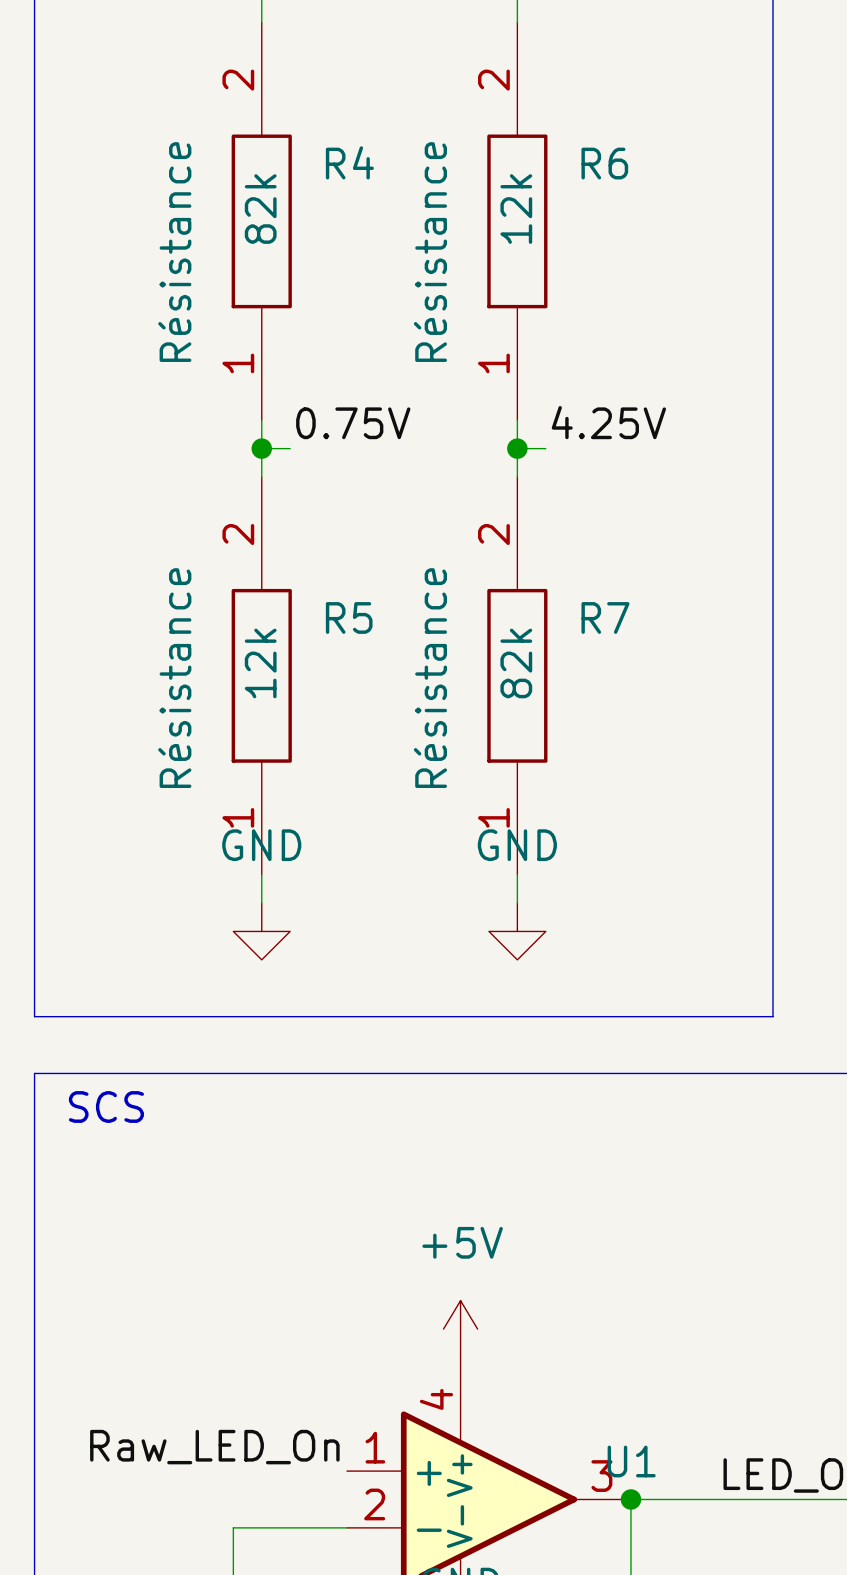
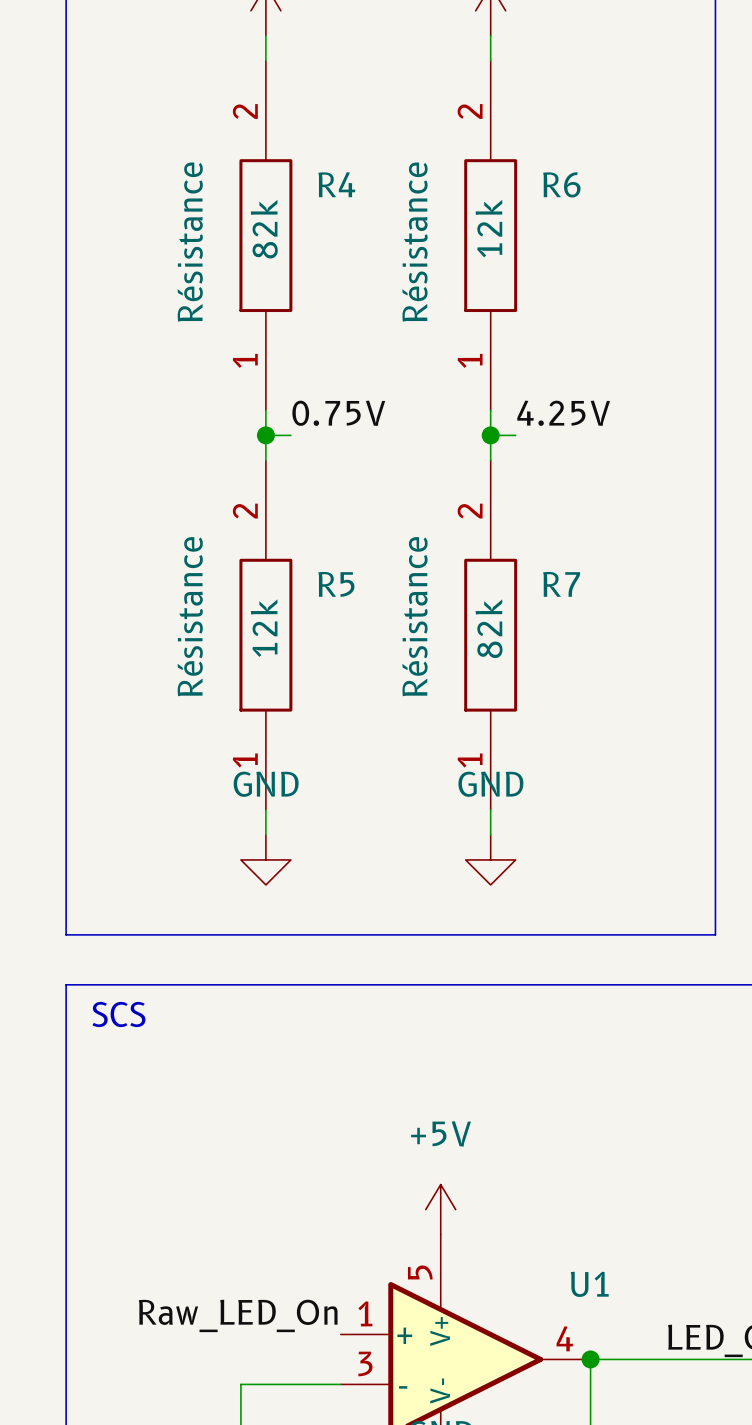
U1 pin number: 4 (436, 1399) -> 5 (420, 1272)
U1 name position: U1 (631, 1461) -> U1 (589, 1284)
U1 pin number: 3 (601, 1476) -> 4 (564, 1338)
U1 pin number: 2 (374, 1504) -> 3 (365, 1363)

